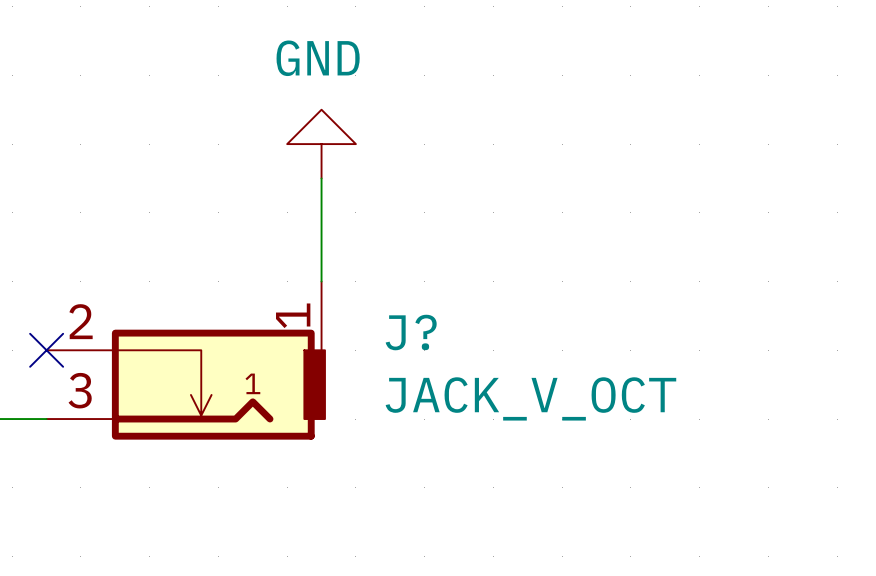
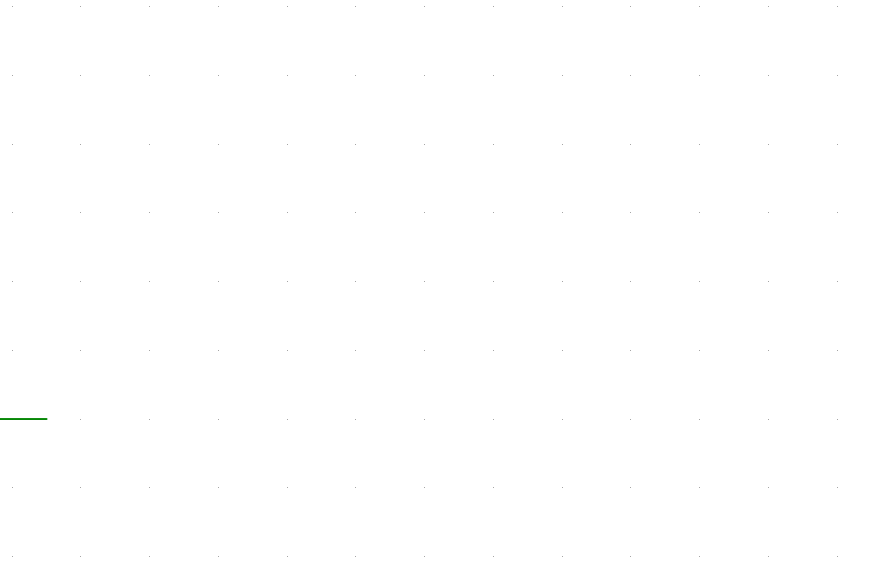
power symbol: GND (321, 144) -> none
wire: (321, 178) (321, 281) -> none
no-connect mark: (46, 350) -> none
J?: JACK_V_OCT (185, 360) -> none

